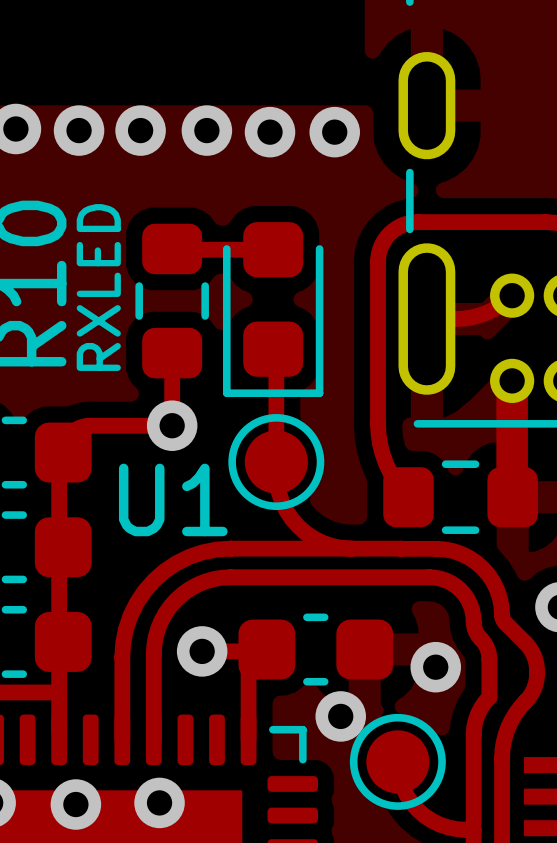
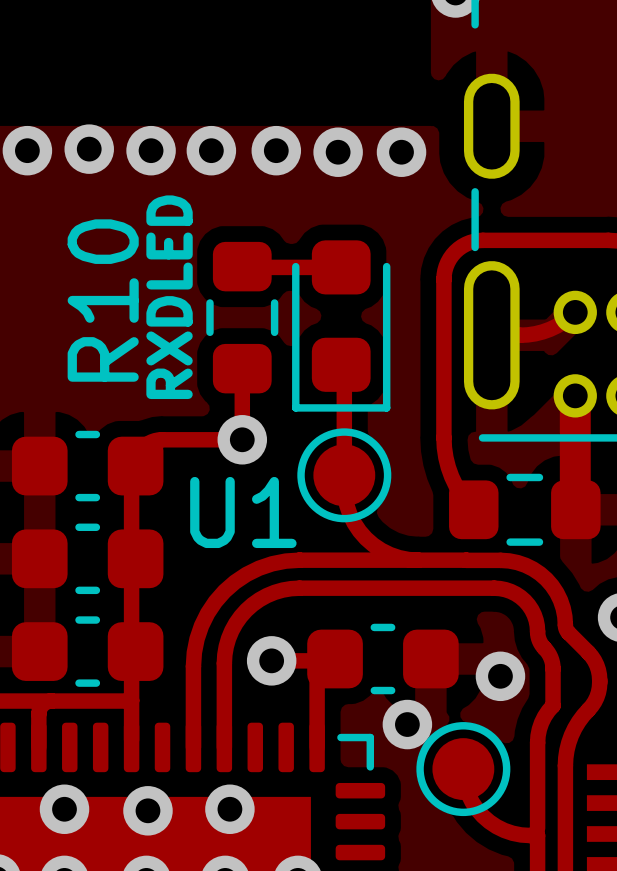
RXDLED name: none -> RXDLED (169, 297)
text: RXLED (98, 287) -> none

